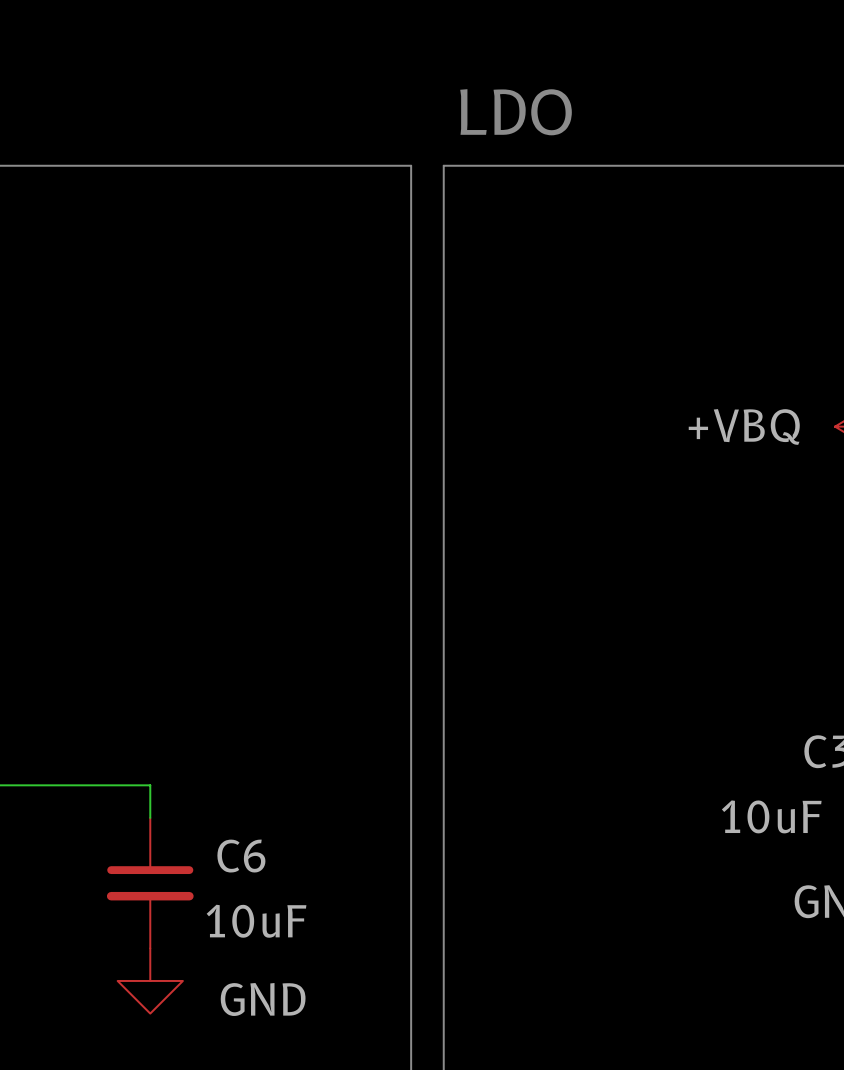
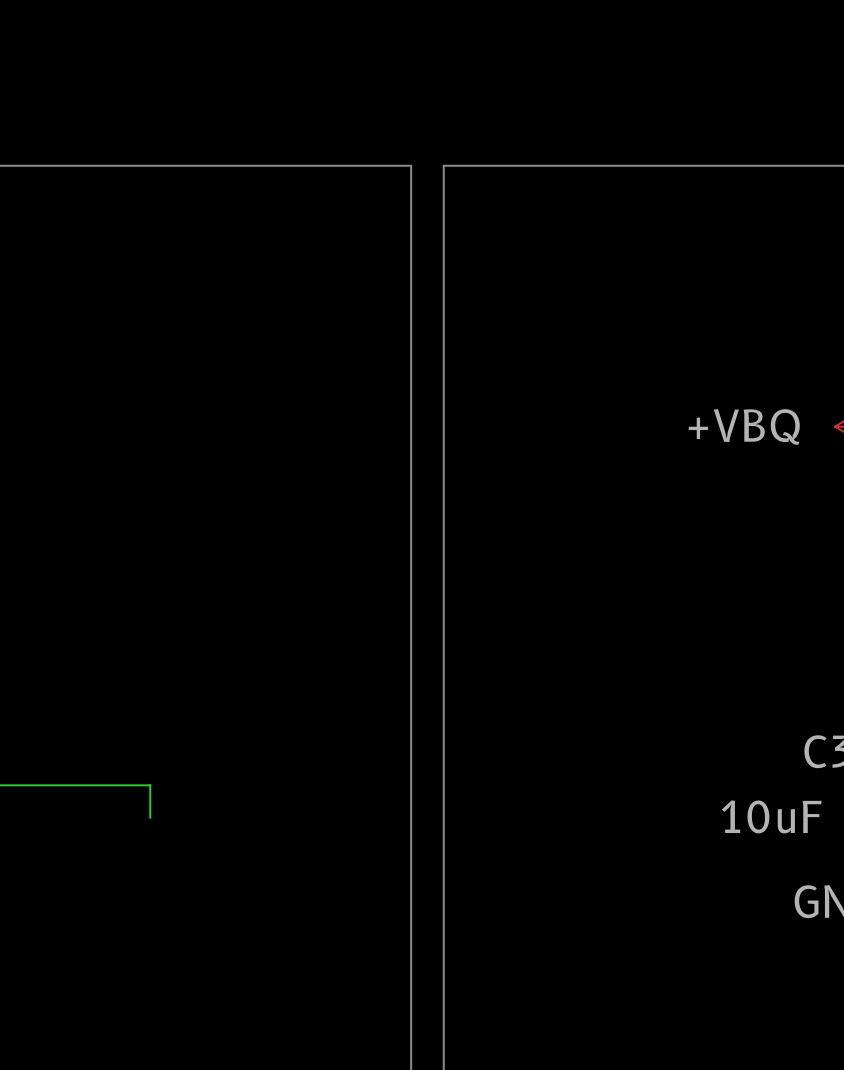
text: LDO (516, 112) -> none
C6: 10uF (150, 883) -> none
power symbol: GND (150, 980) -> none

